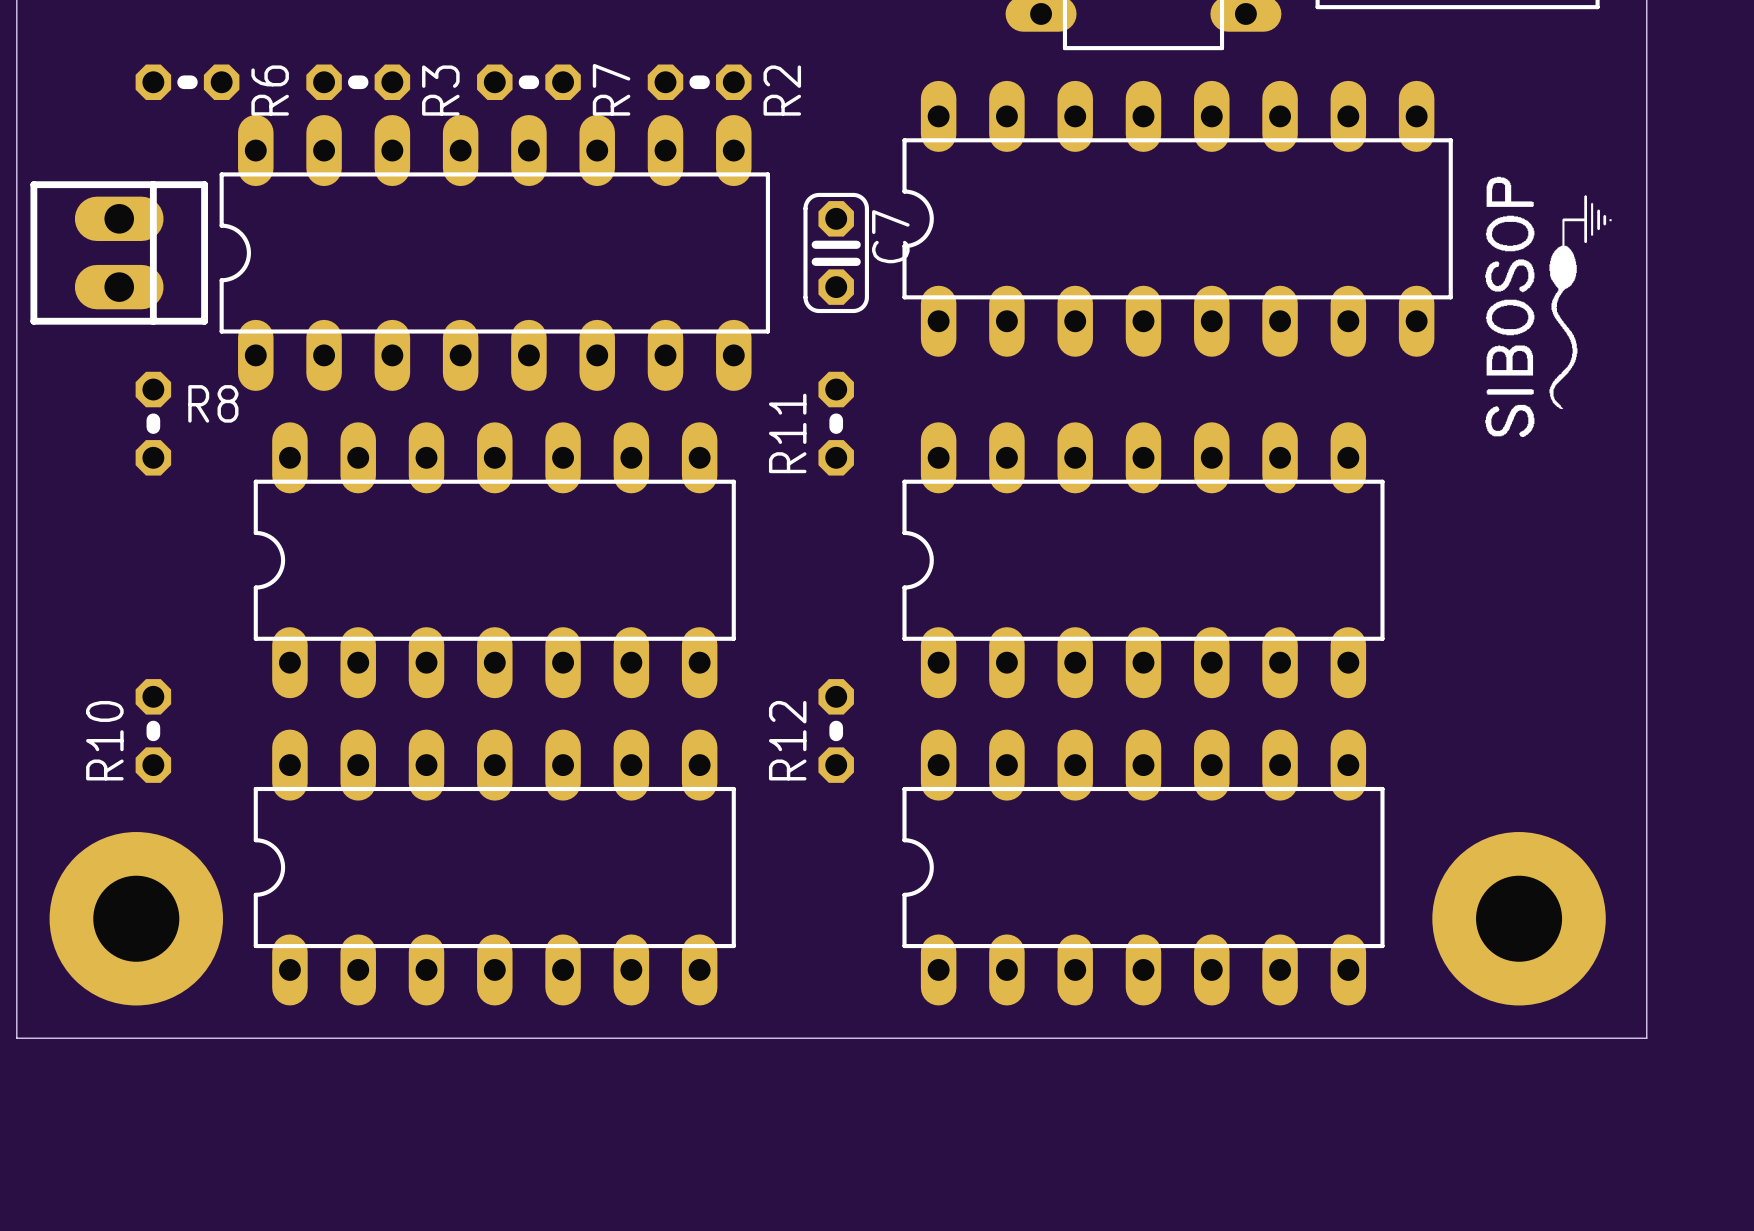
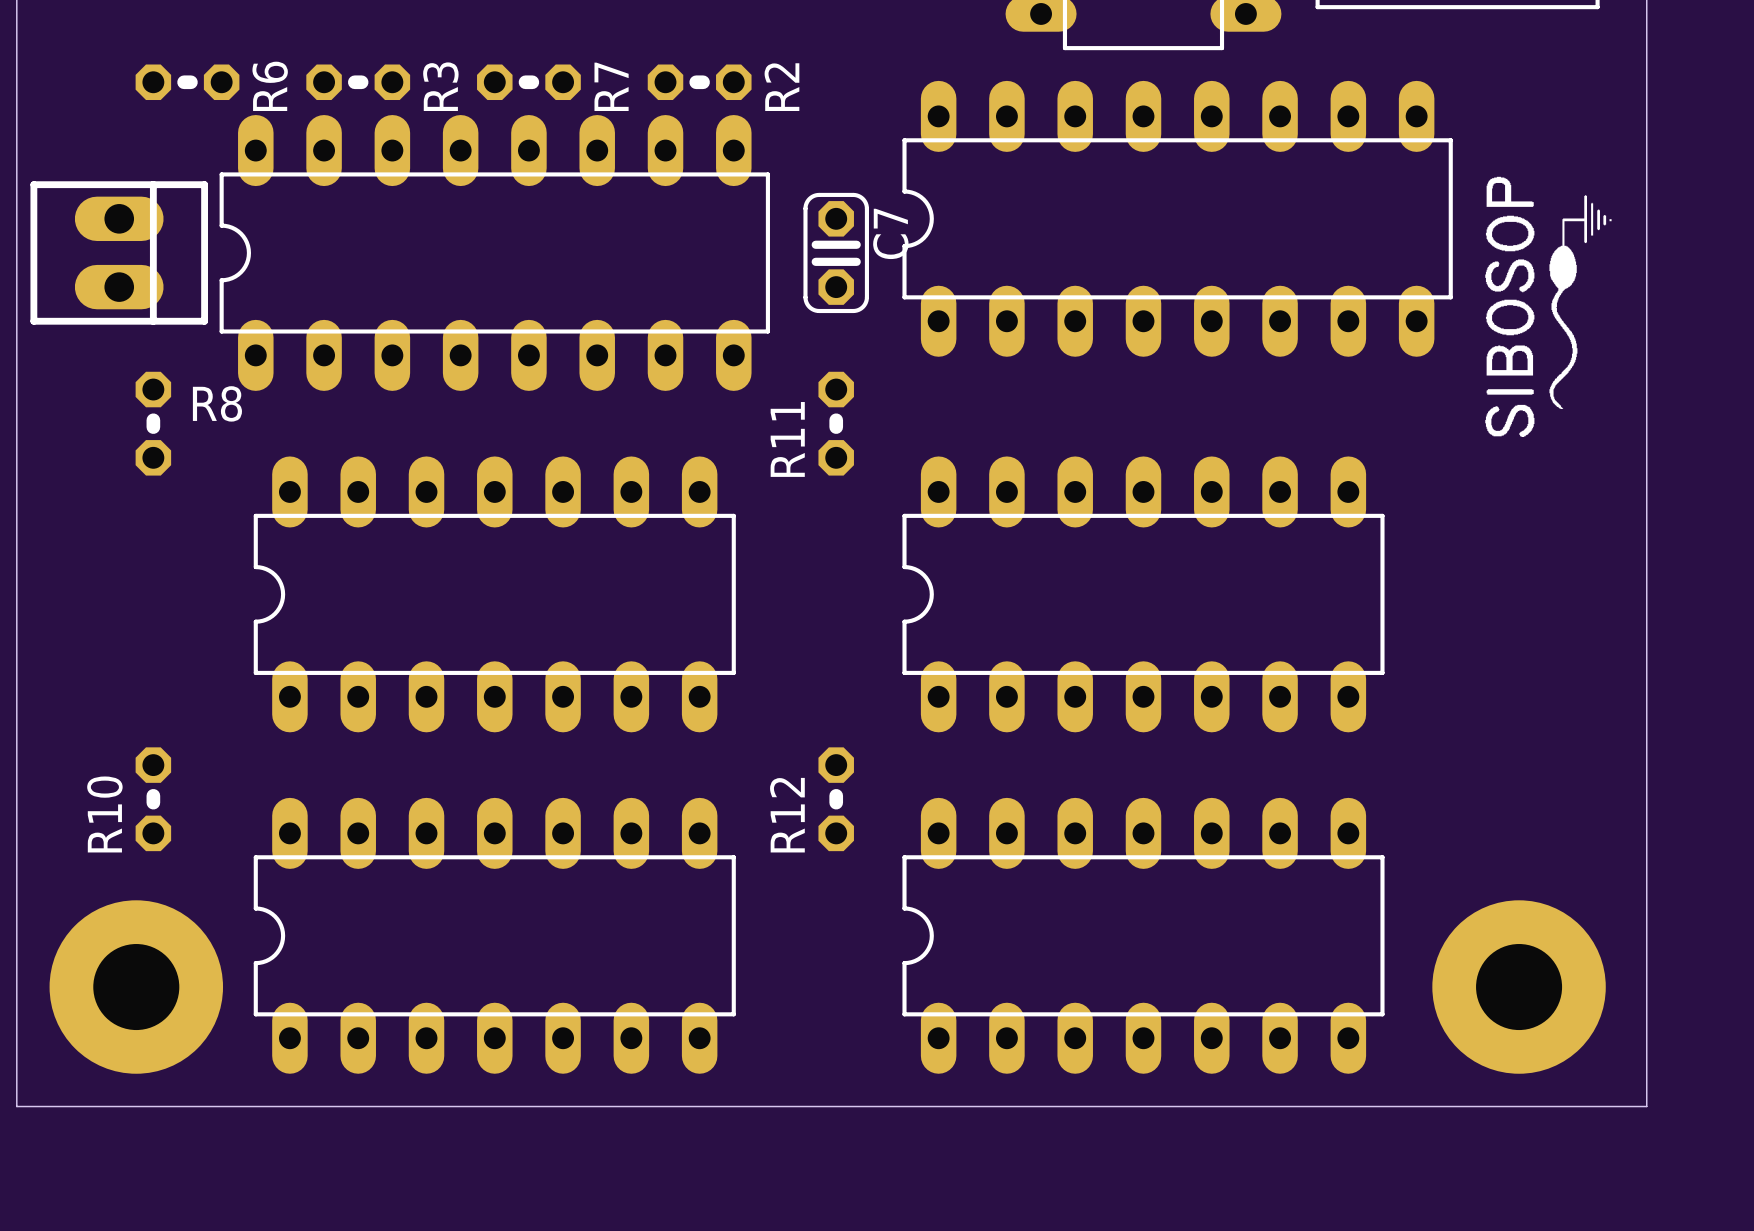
part position: (494, 560) -> (494, 594)
part position: (1143, 560) -> (1143, 594)
R10 position: (153, 730) -> (153, 799)
R12 position: (836, 730) -> (836, 799)
part position: (494, 867) -> (494, 935)
part position: (1143, 867) -> (1143, 935)
part position: (136, 918) -> (136, 987)
part position: (1519, 918) -> (1519, 987)
board edge: (16, 1038) (1646, 1038) -> (16, 1038) (16, 1106) (1646, 1106) (1646, 1038)

